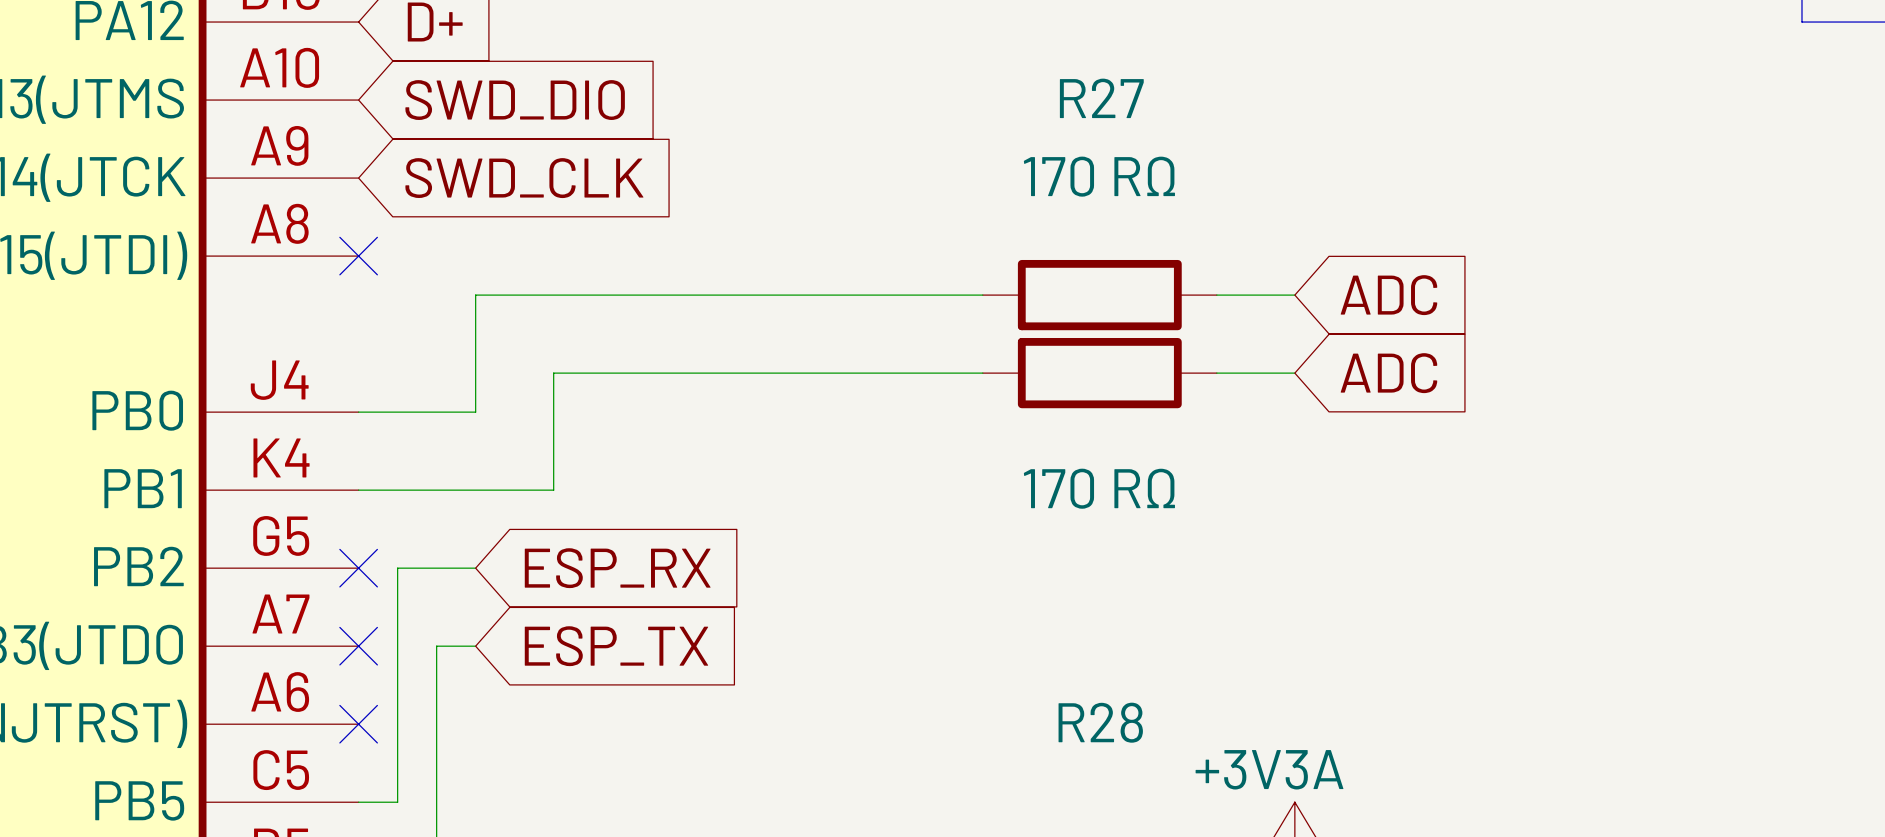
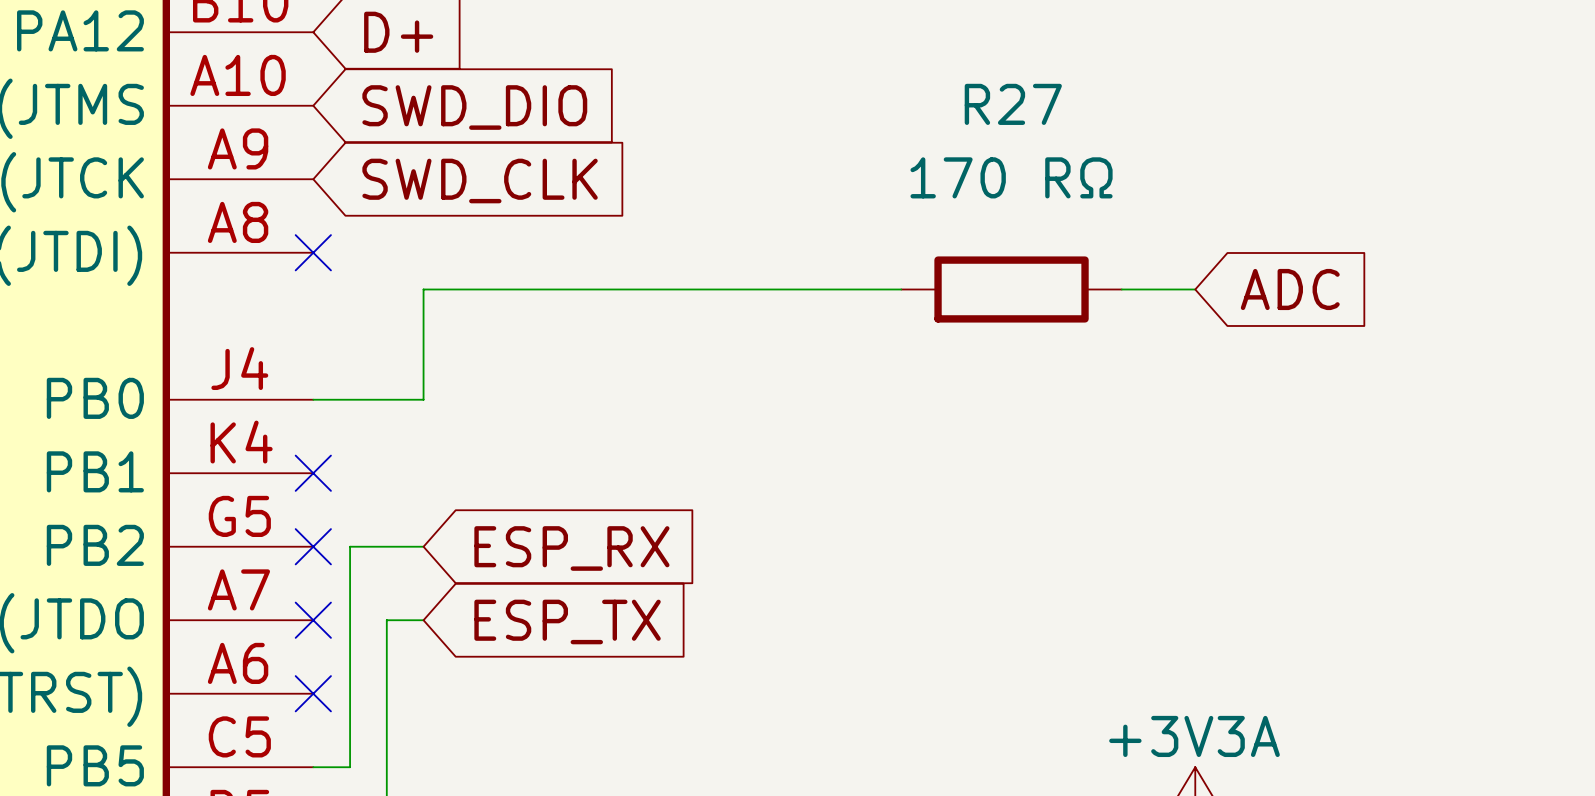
wire: (982, 373) (553, 373) (553, 490) (358, 490) -> none
R28: 170 RΩ (1099, 373) -> none
wire: (1216, 373) (1294, 373) -> none
global label: ADC (1388, 373) -> none
no-connect mark: none -> (313, 473)

